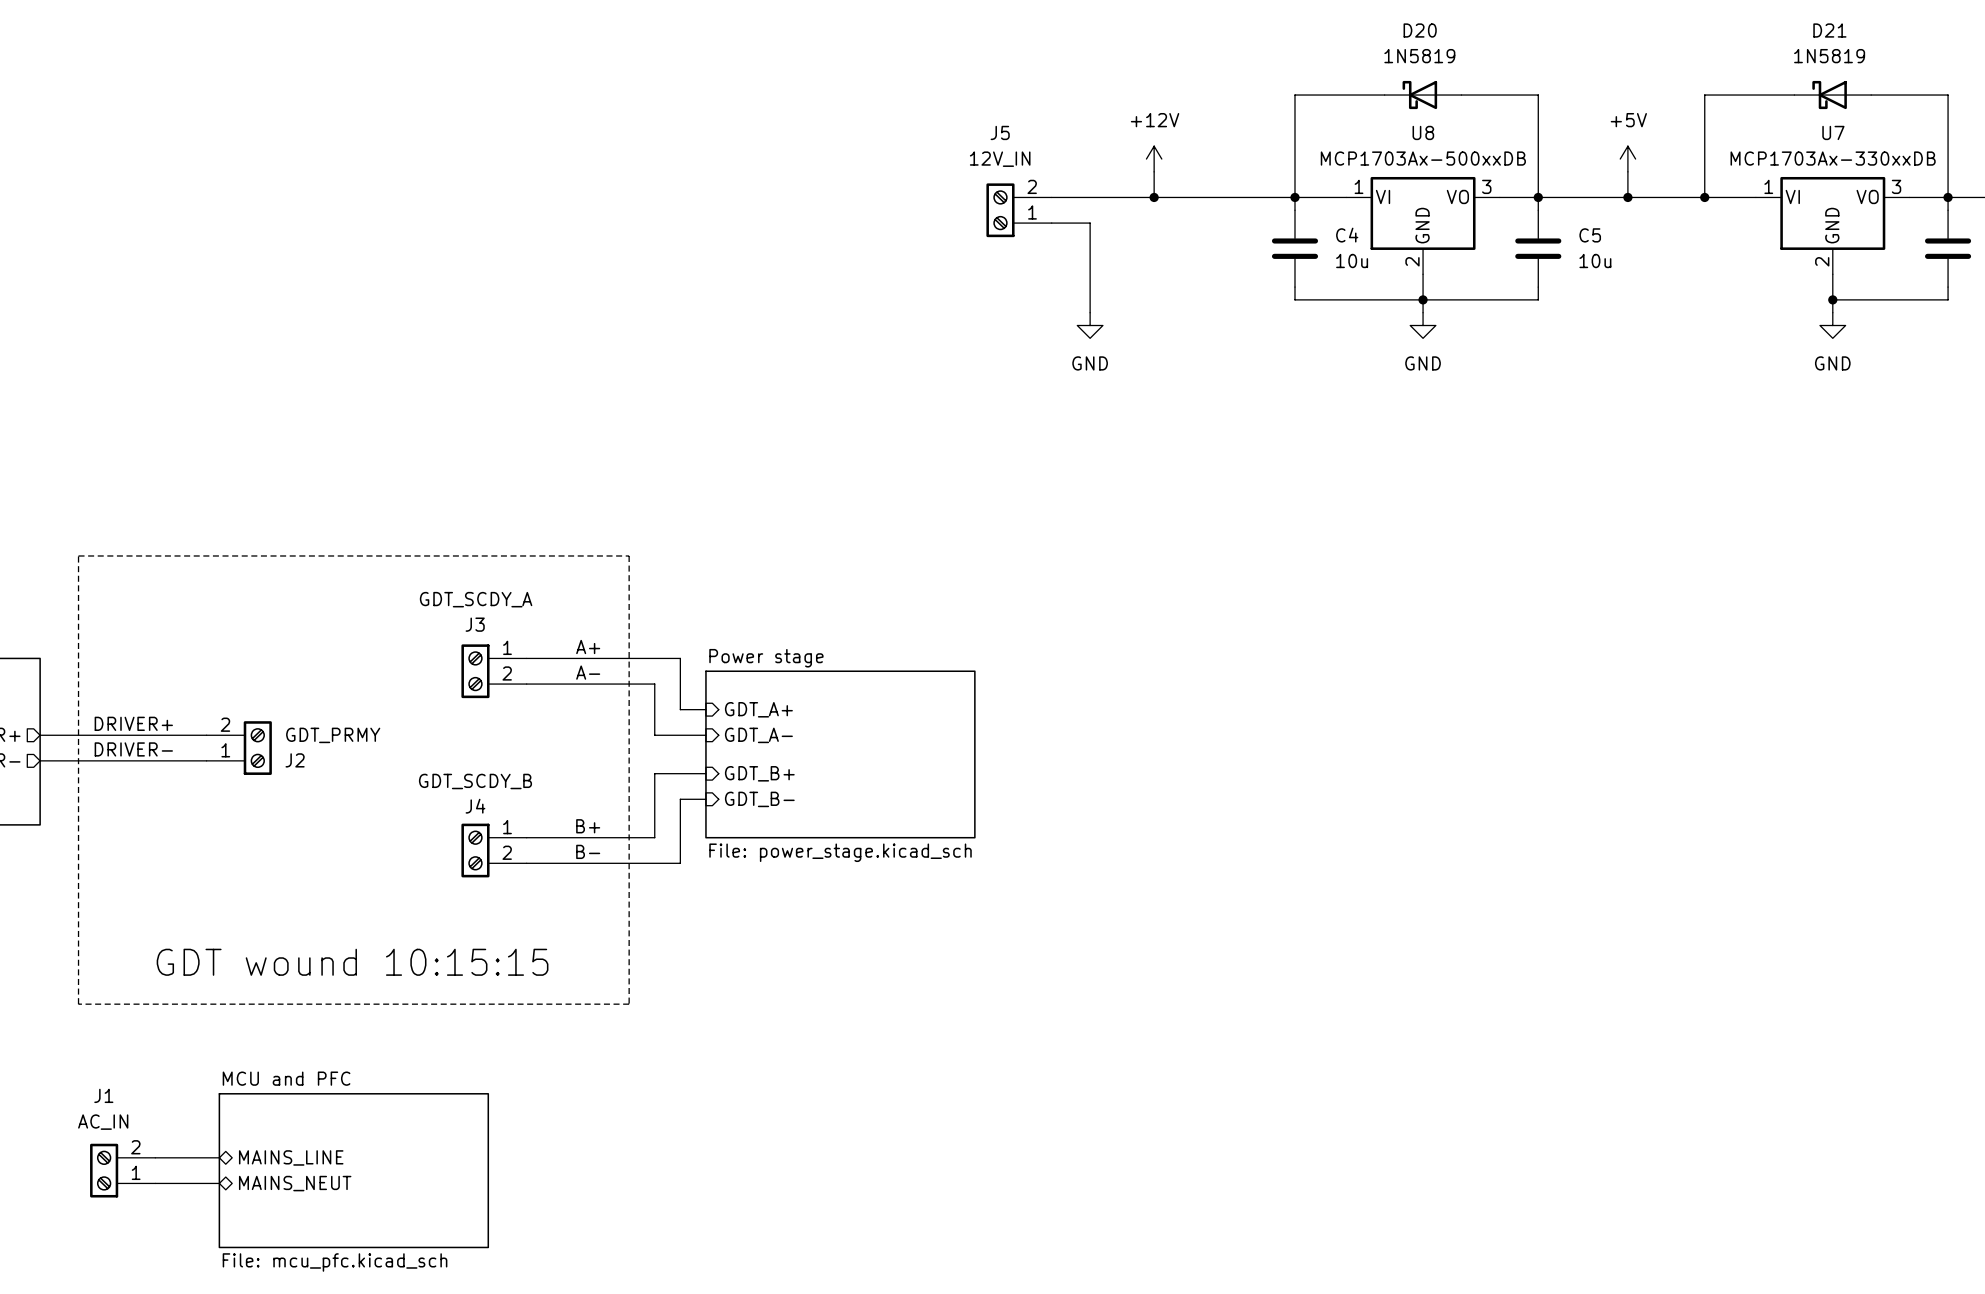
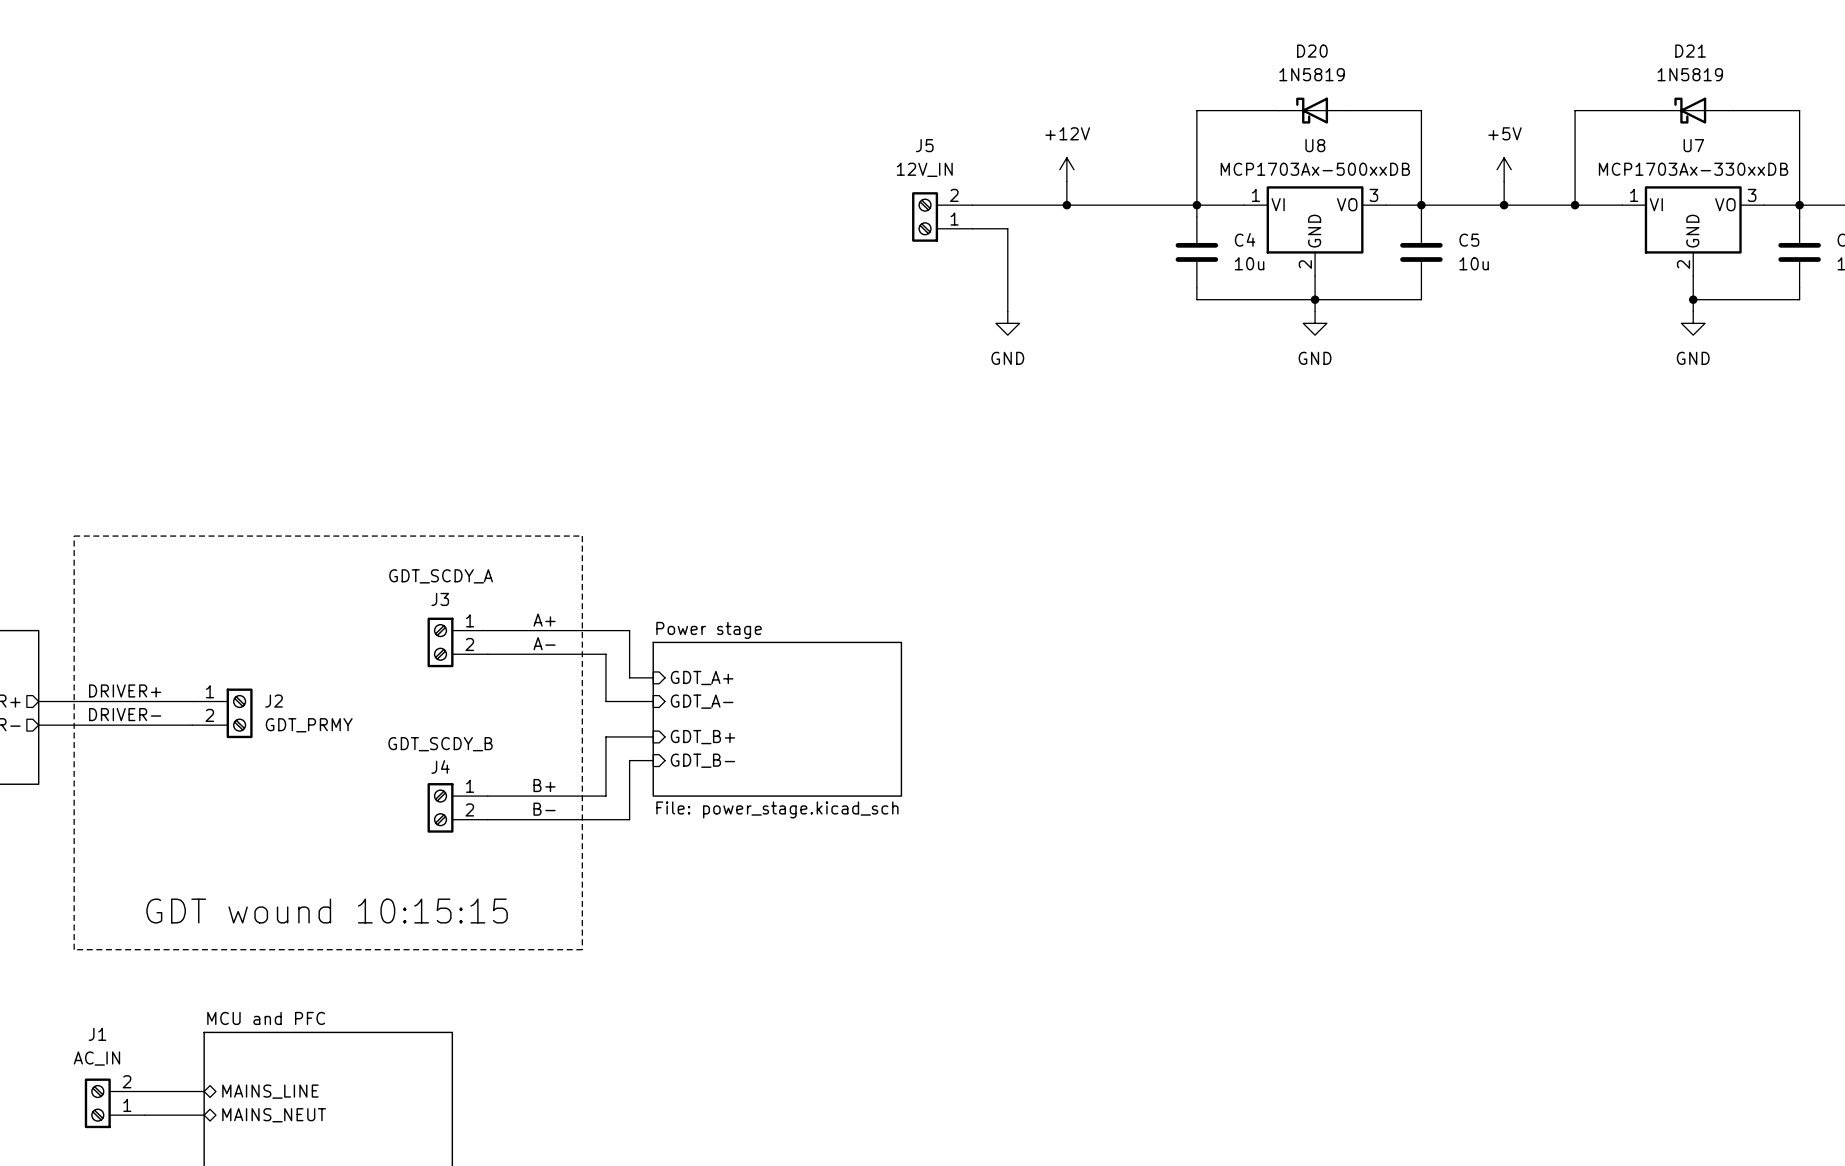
J2 flip: as is (257, 748) -> up-down (239, 713)

